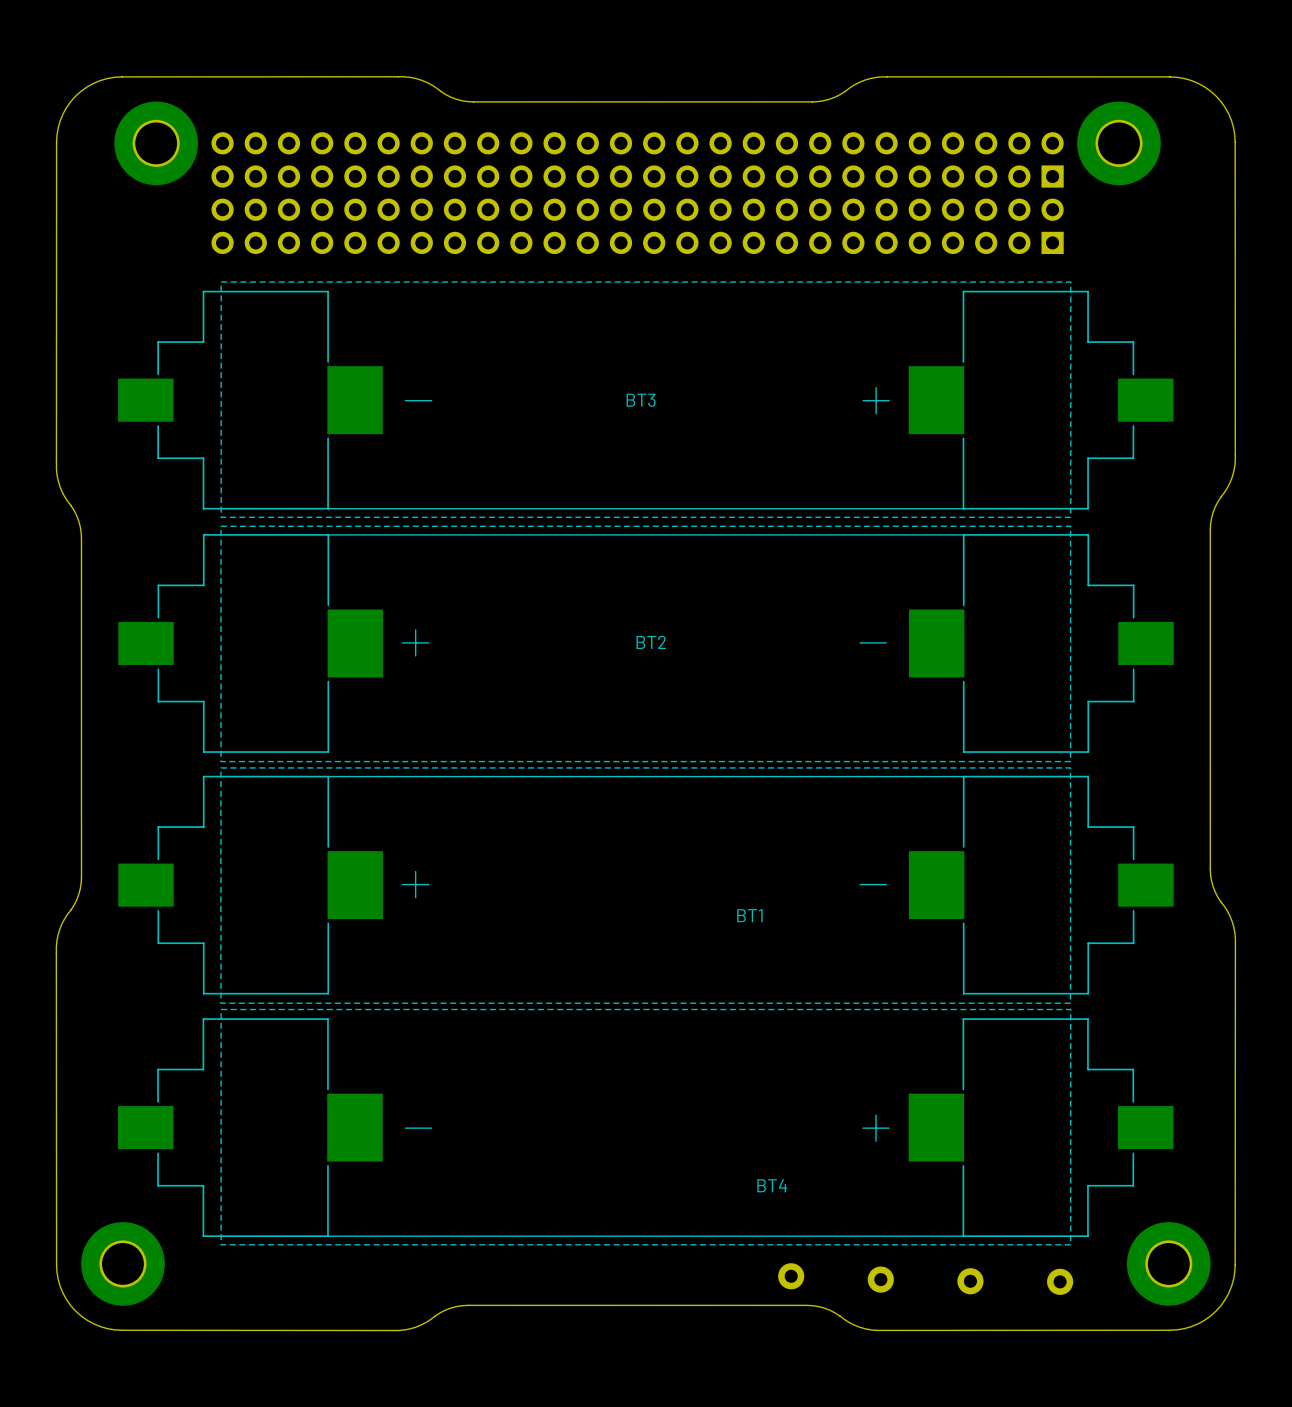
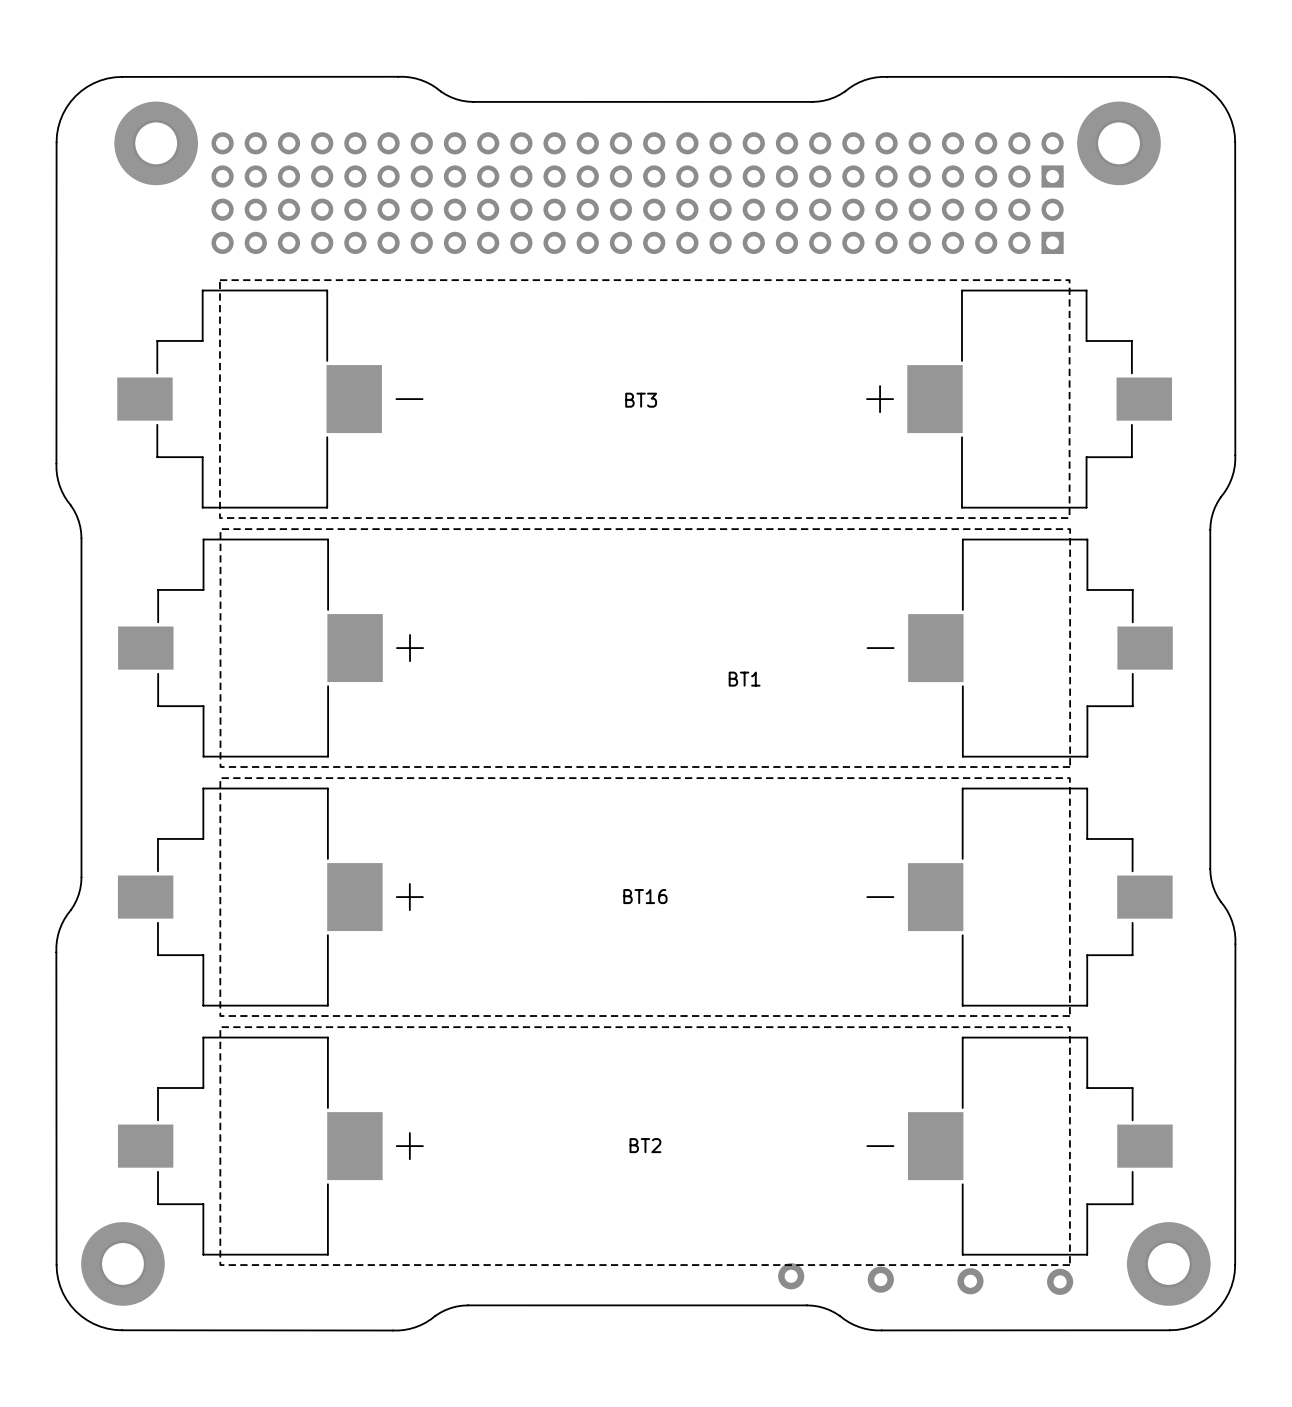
BT3 footprint: [118, 281, 1174, 518] -> [117, 279, 1172, 519]
BT2 footprint: [118, 525, 1174, 763] -> [117, 1026, 1173, 1266]
BT1 footprint: [118, 767, 1174, 1004] -> [118, 528, 1173, 768]
BT16: none -> (645, 897)
BT4: (645, 1127) -> none

